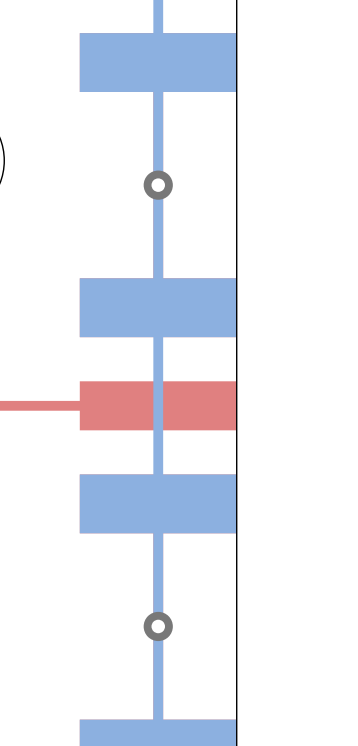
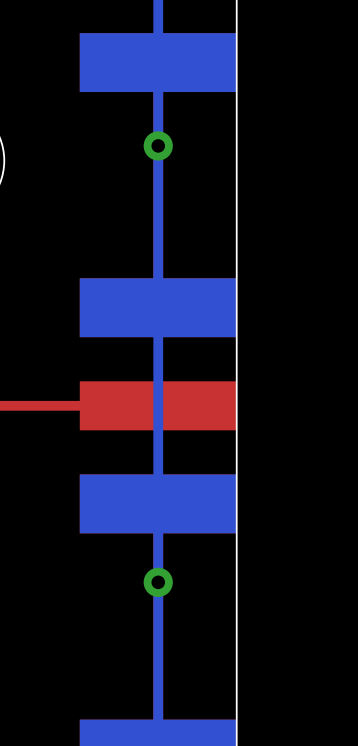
via position: (158, 185) -> (158, 145)
via position: (158, 626) -> (158, 582)

